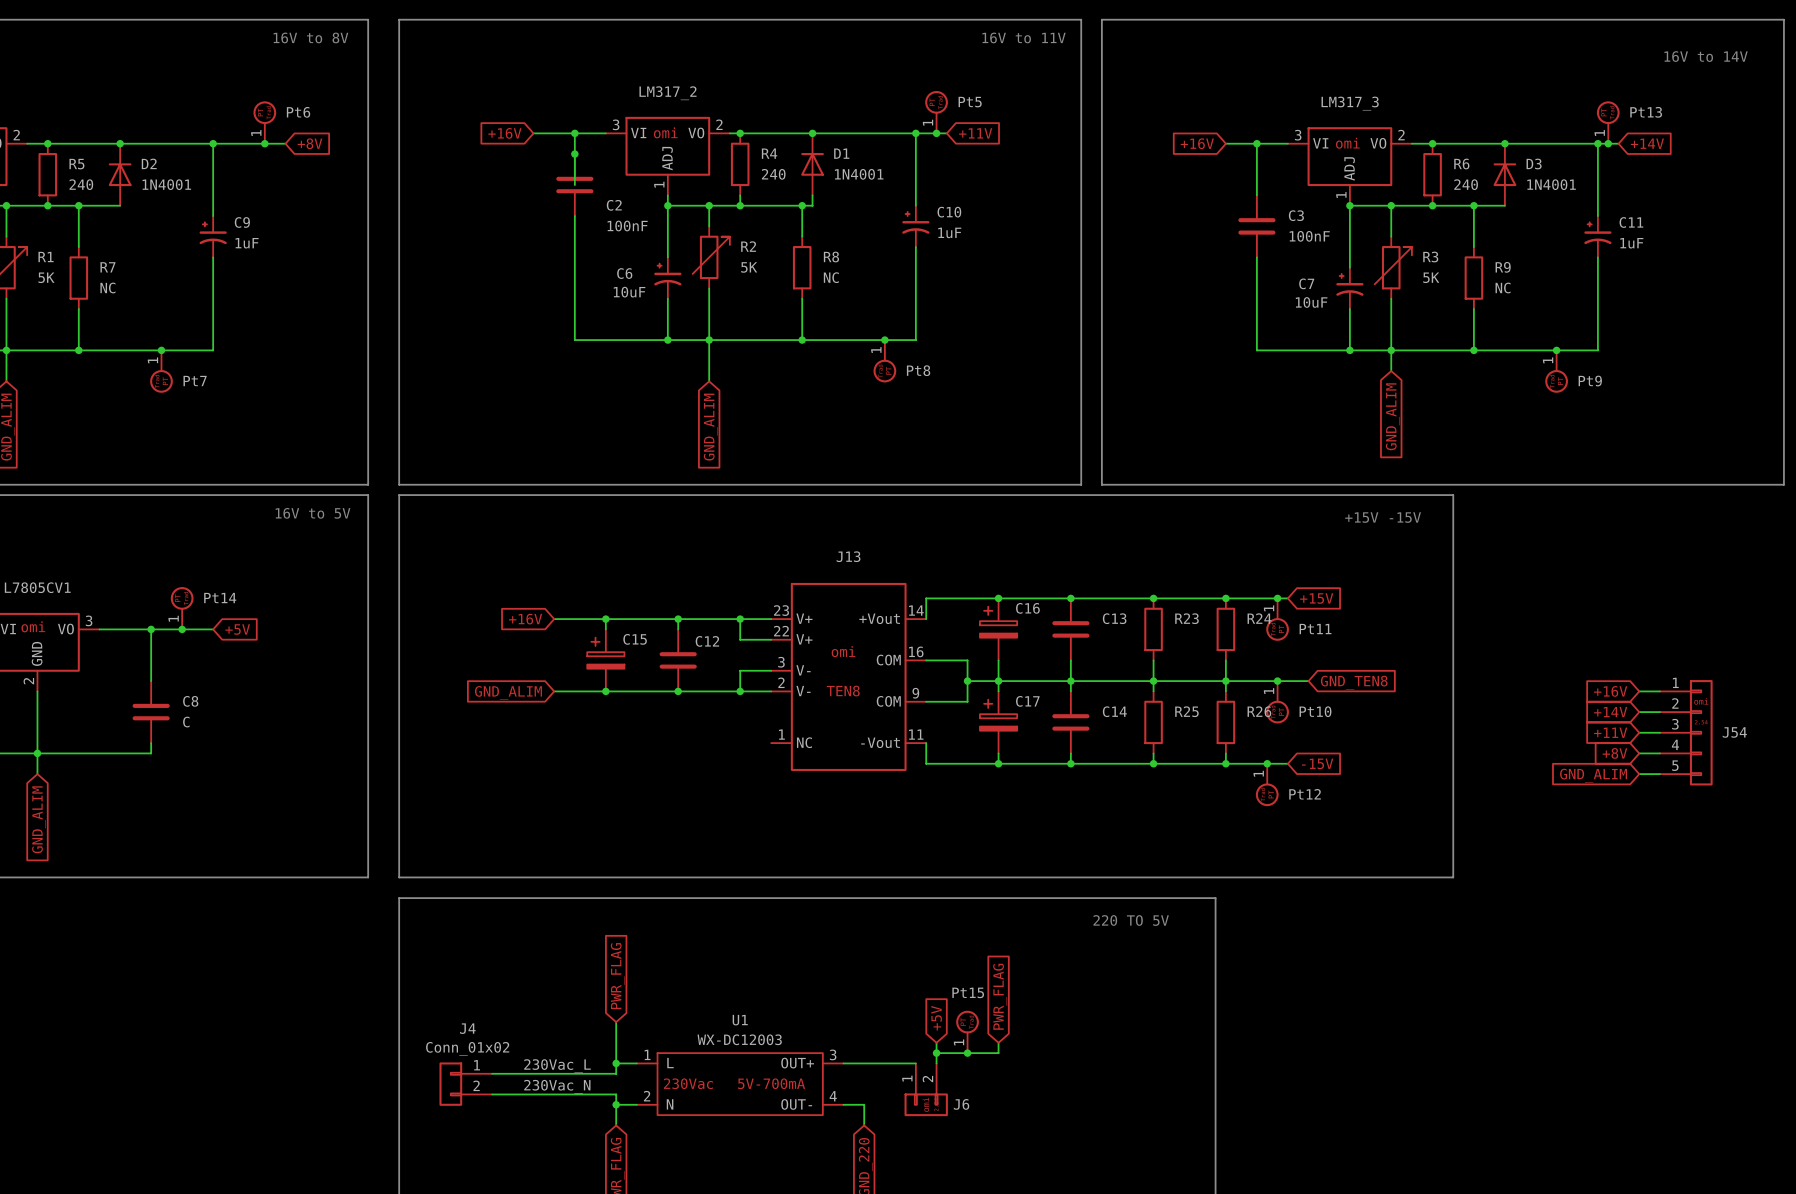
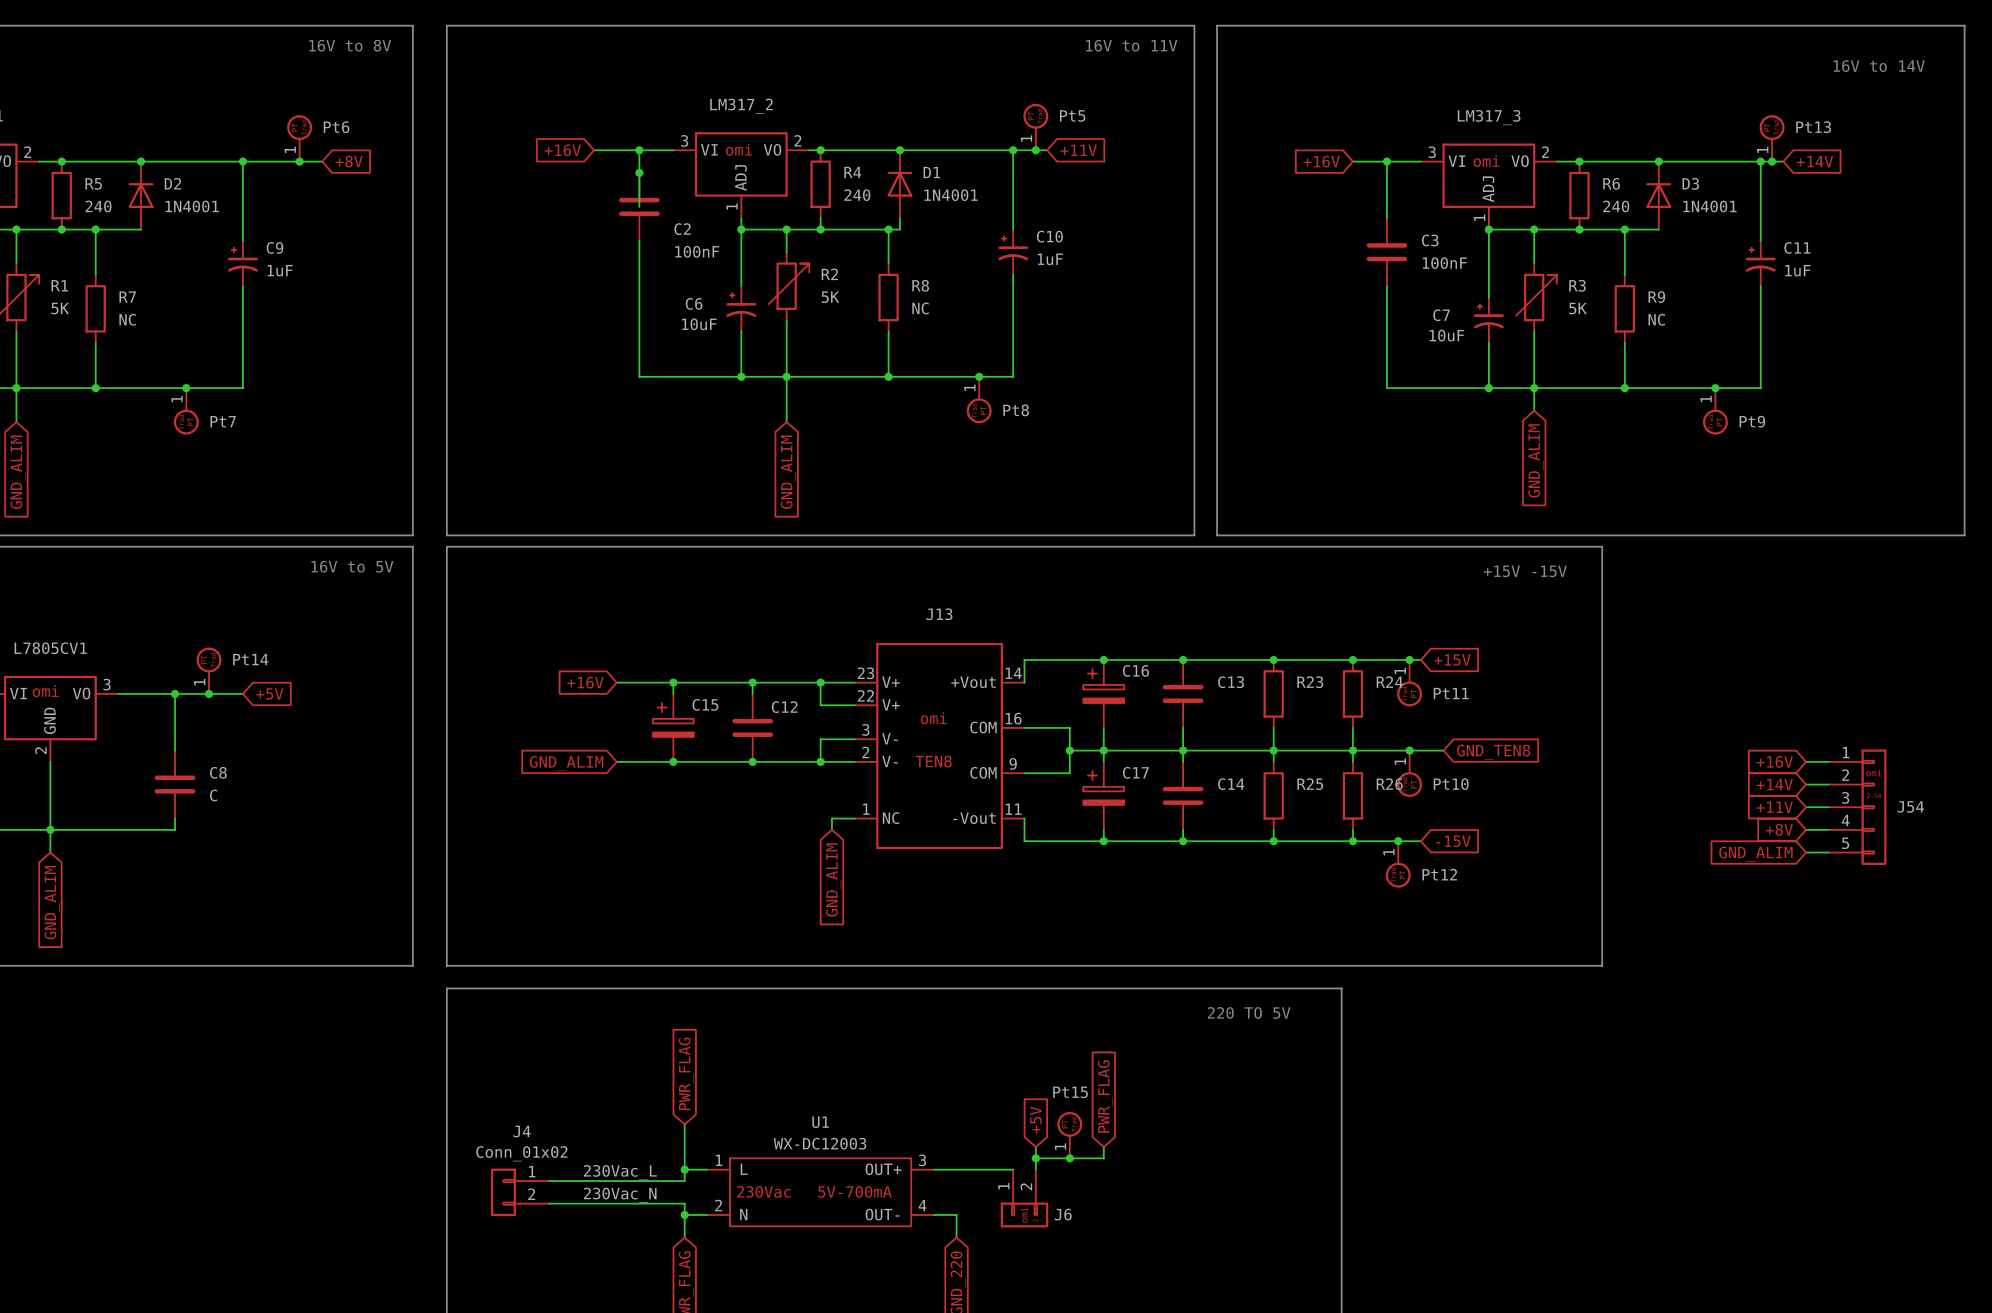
wire: none -> (854, 818) (831, 818) (831, 829)
global label: none -> GND_ALIM (833, 879)

